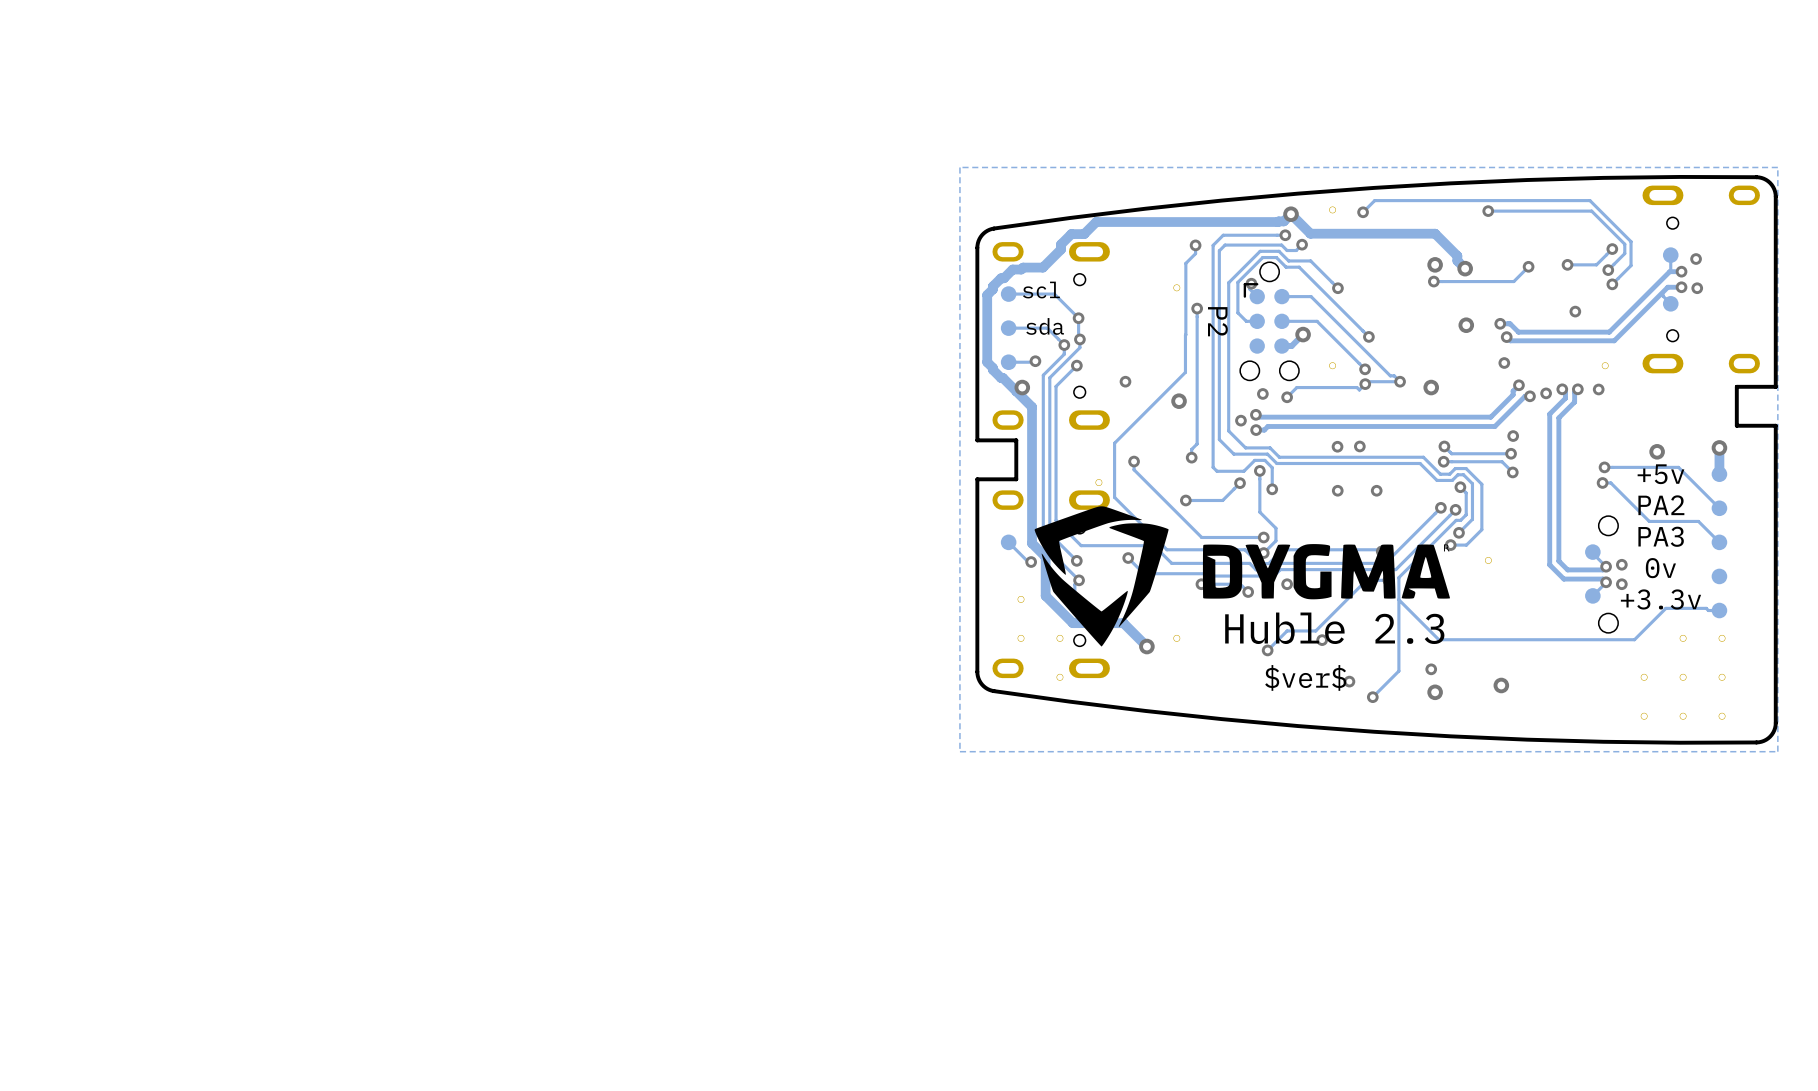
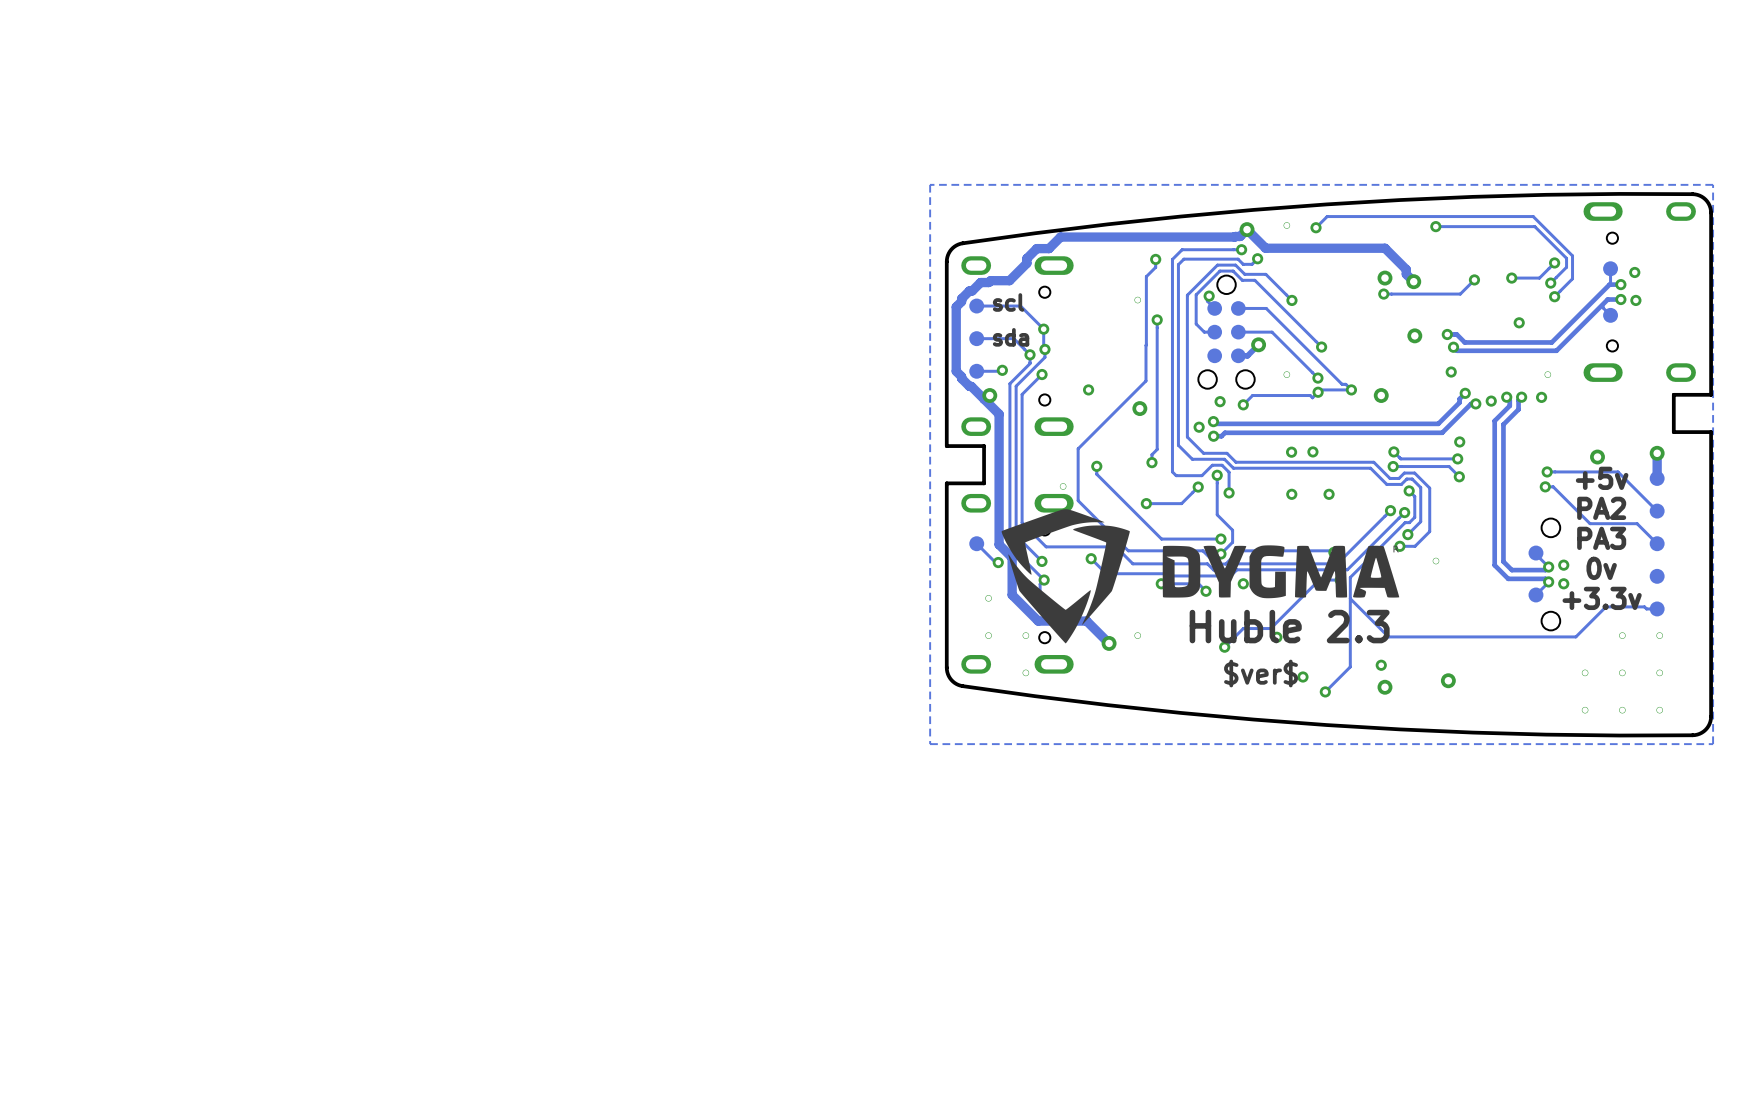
P2: (1269, 321) -> none

